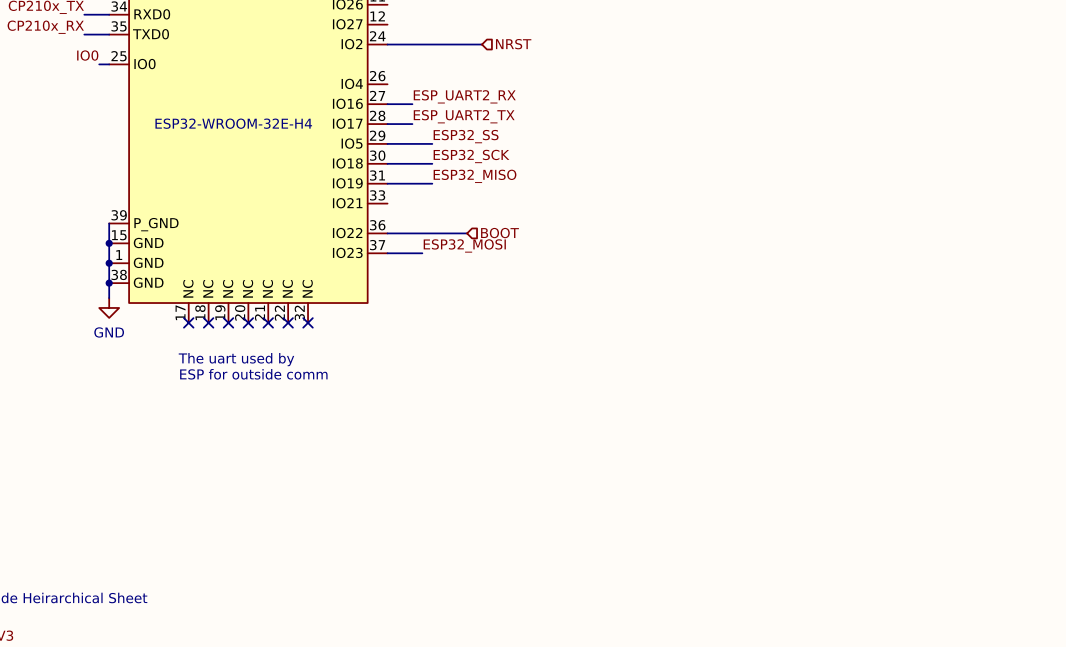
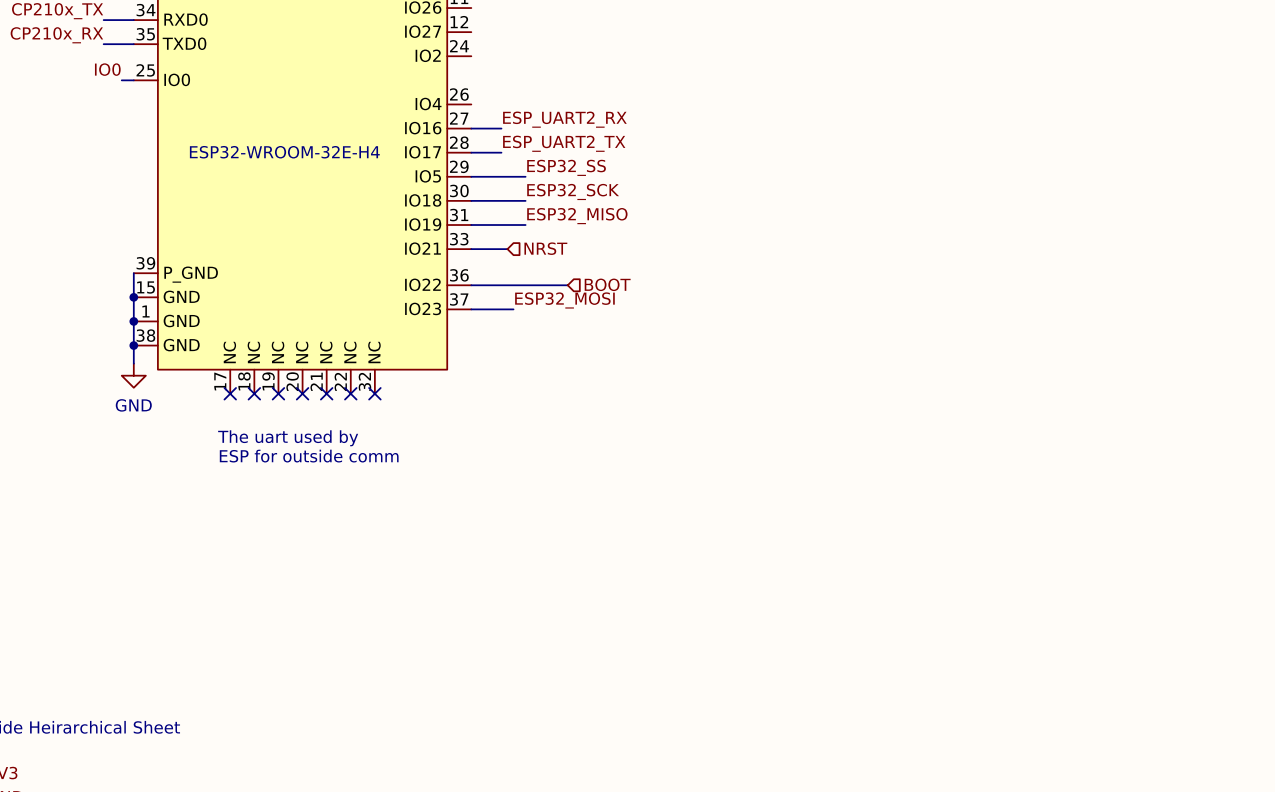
wire: (387, 44) (482, 44) -> none
hierarchical label position: NRST (513, 44) -> NRST (545, 248)
wire: none -> (471, 249) (507, 249)

